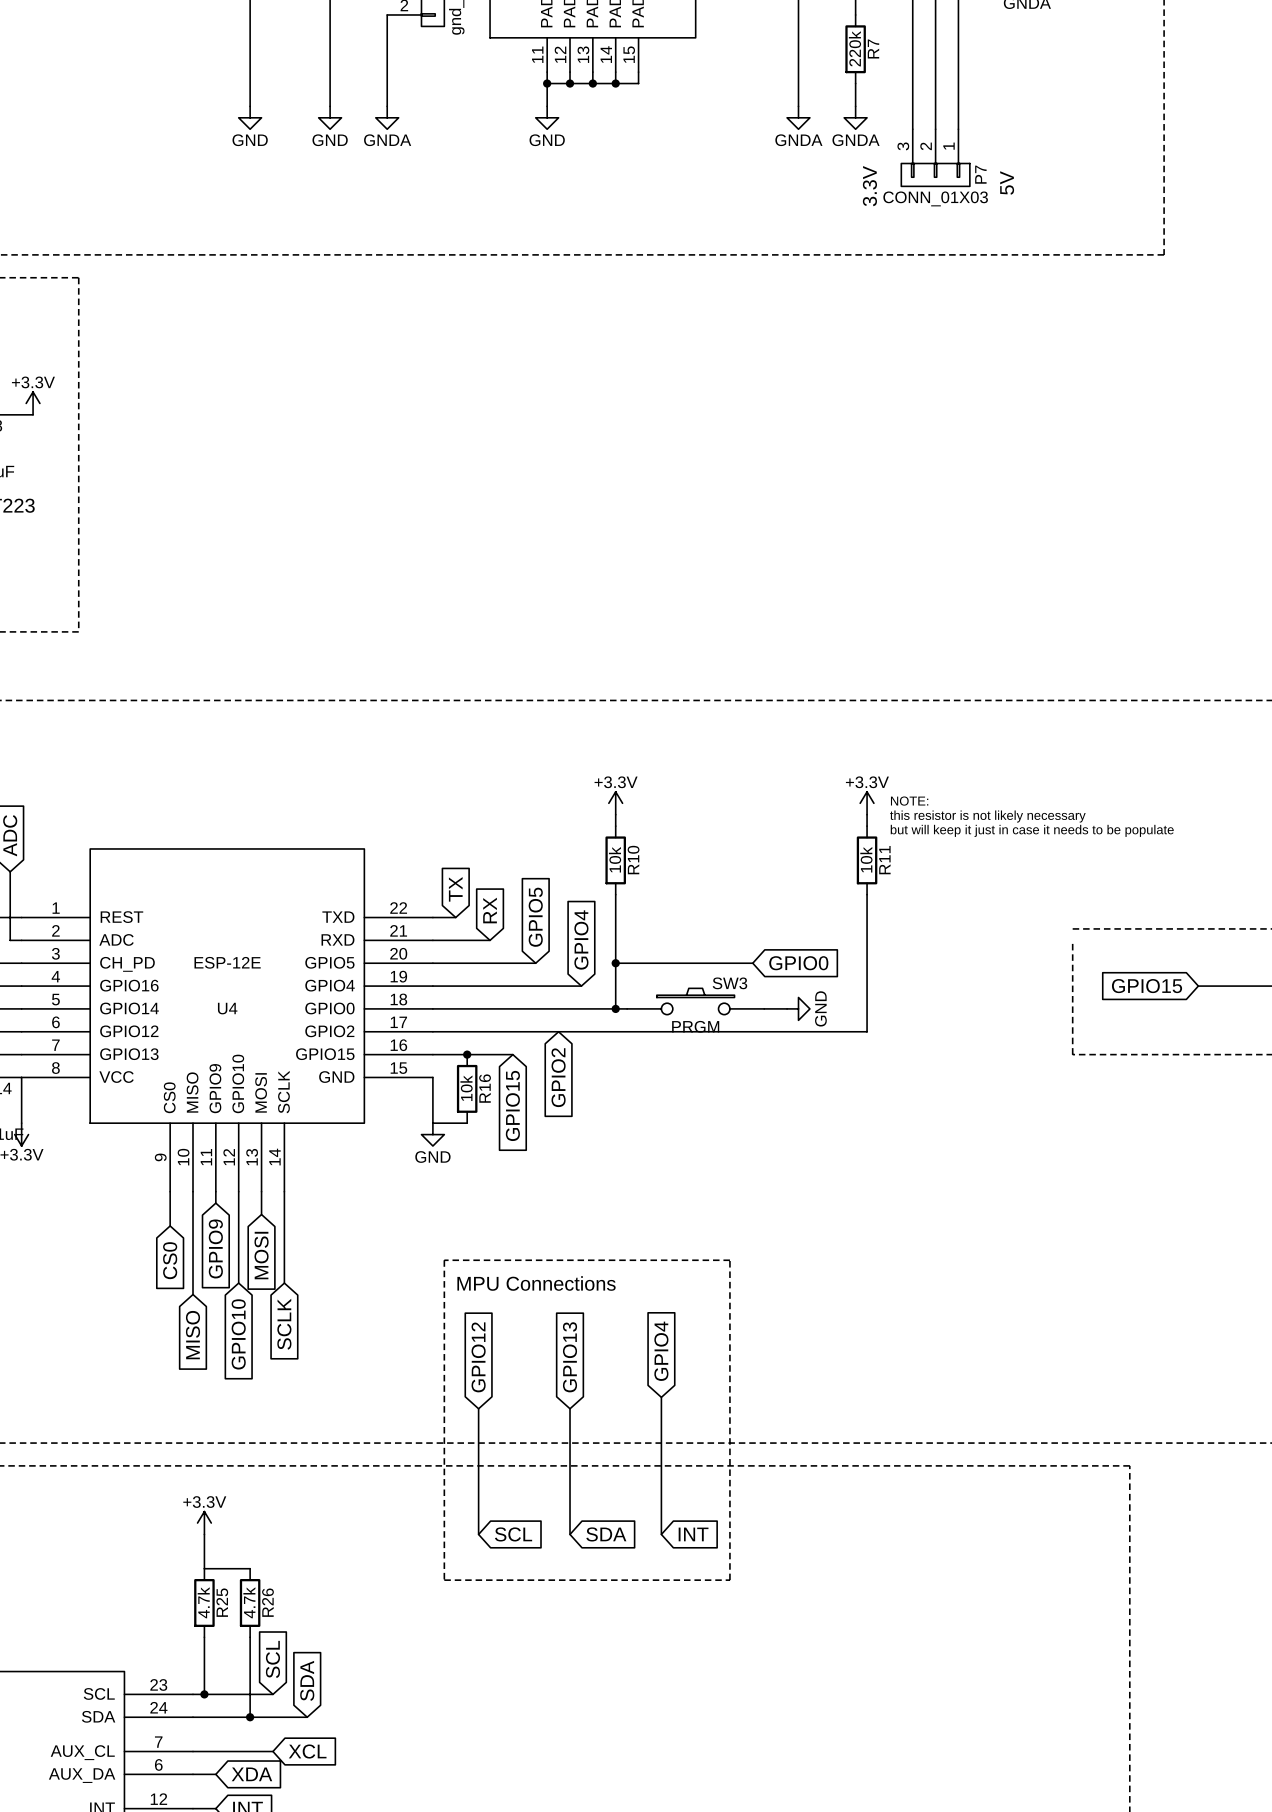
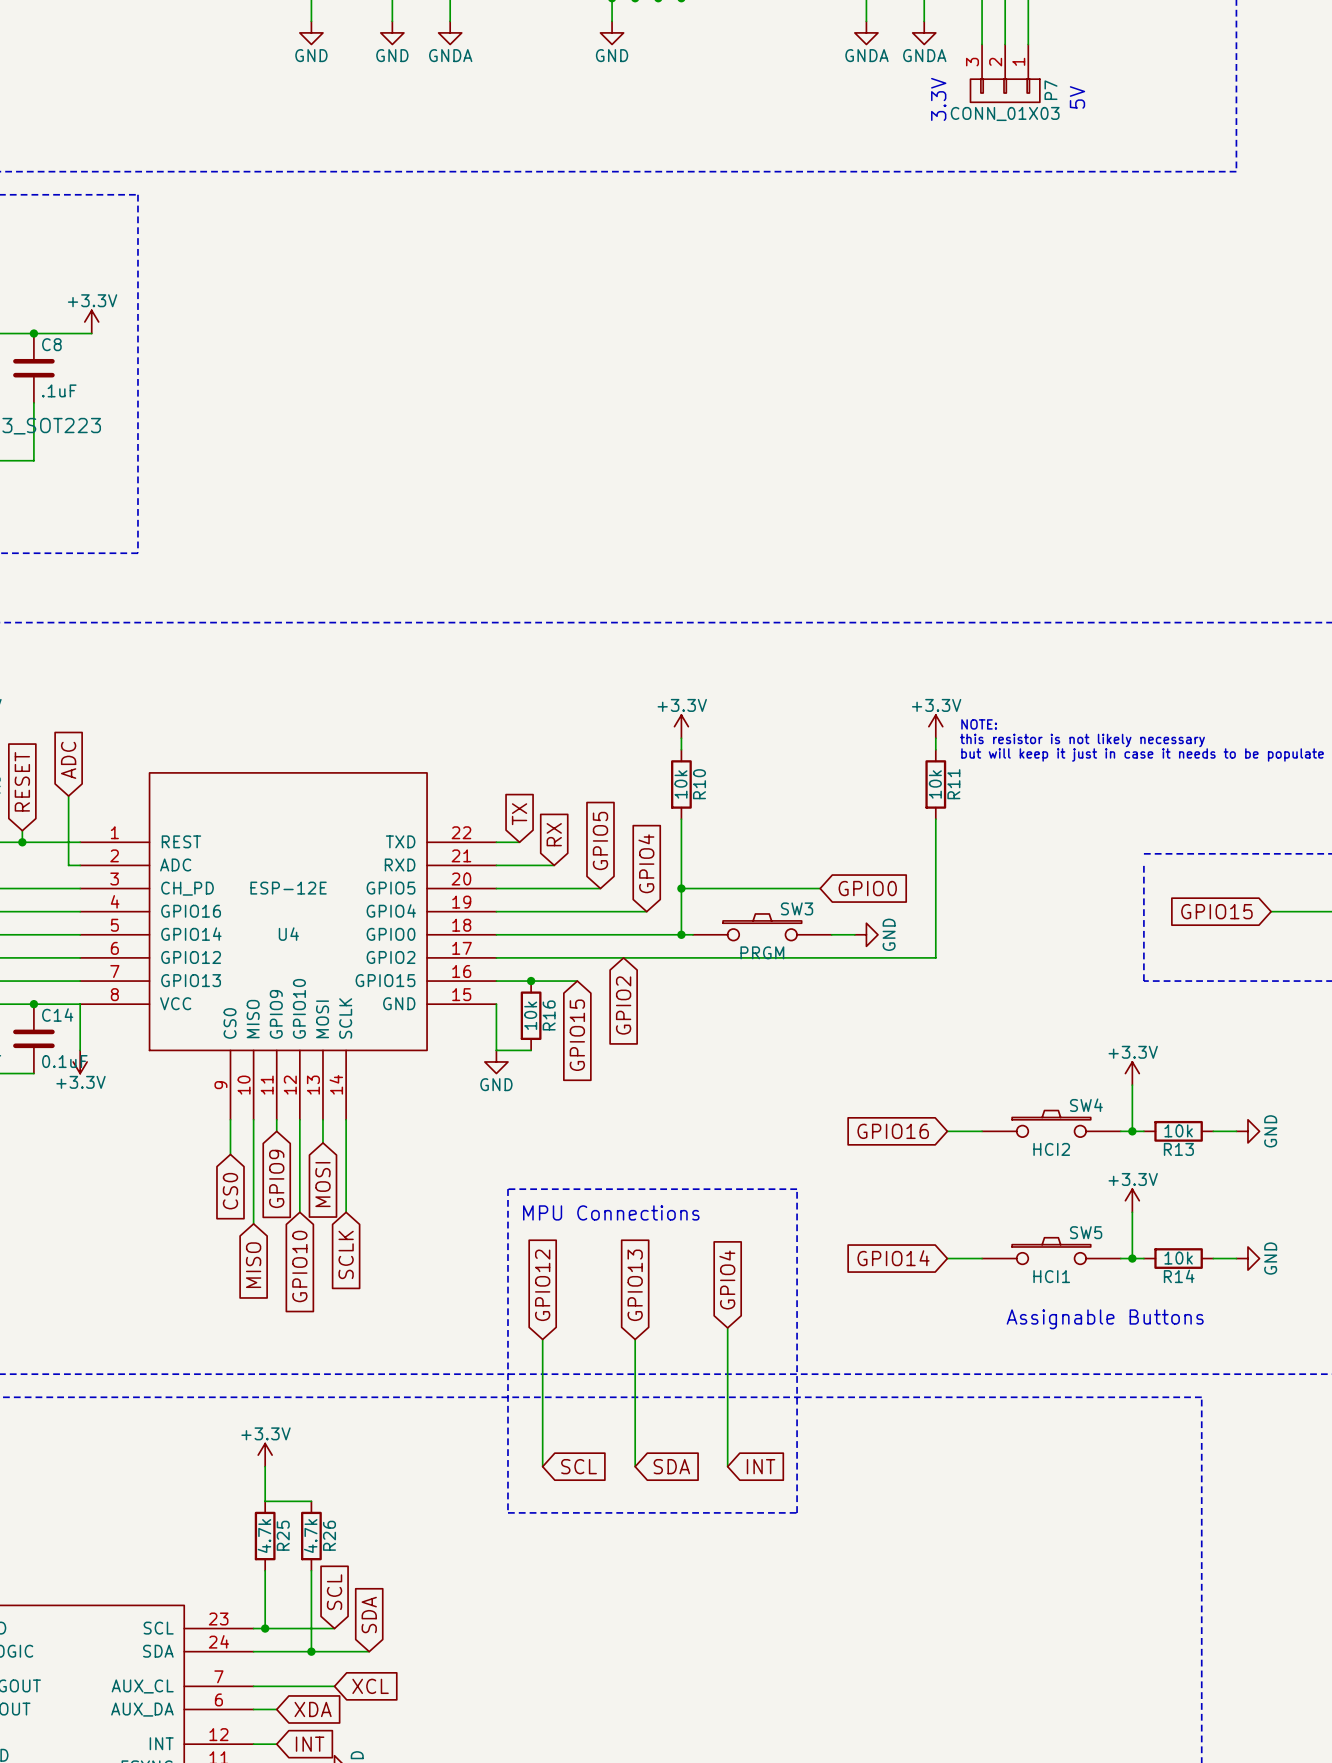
power symbol: none -> +3.3V (1132, 1073)
wire: none -> (1132, 1085) (1132, 1131)
SW4: none -> HCI2 (1051, 1123)
global label: none -> GPIO16 (893, 1131)
wire: none -> (947, 1131) (982, 1131)
wire: none -> (1120, 1131) (1143, 1131)
junction: none -> (1132, 1131)
R13: none -> 10k (1178, 1131)
wire: none -> (1213, 1131) (1236, 1131)
power symbol: none -> GND (1247, 1131)
power symbol: none -> +3.3V (1132, 1200)
wire: none -> (1132, 1212) (1132, 1258)
SW5: none -> HCI1 (1051, 1251)
global label: none -> GPIO14 (893, 1258)
wire: none -> (947, 1258) (982, 1258)
wire: none -> (1120, 1258) (1143, 1258)
junction: none -> (1132, 1258)
R14: none -> 10k (1178, 1258)
wire: none -> (1213, 1258) (1236, 1258)
power symbol: none -> GND (1247, 1258)
text: none -> Assignable Buttons (1105, 1319)

